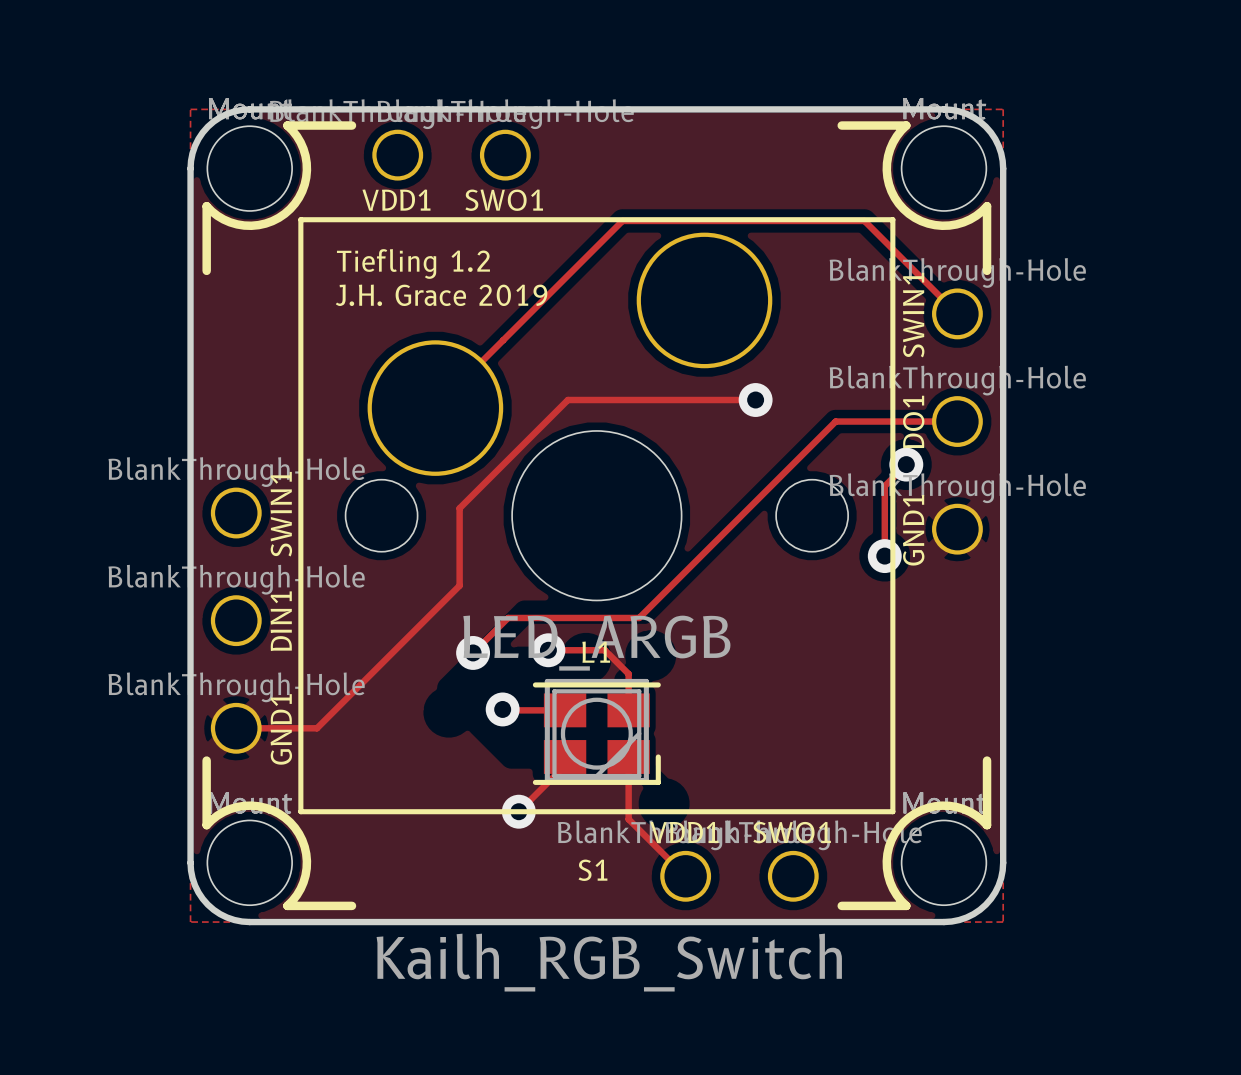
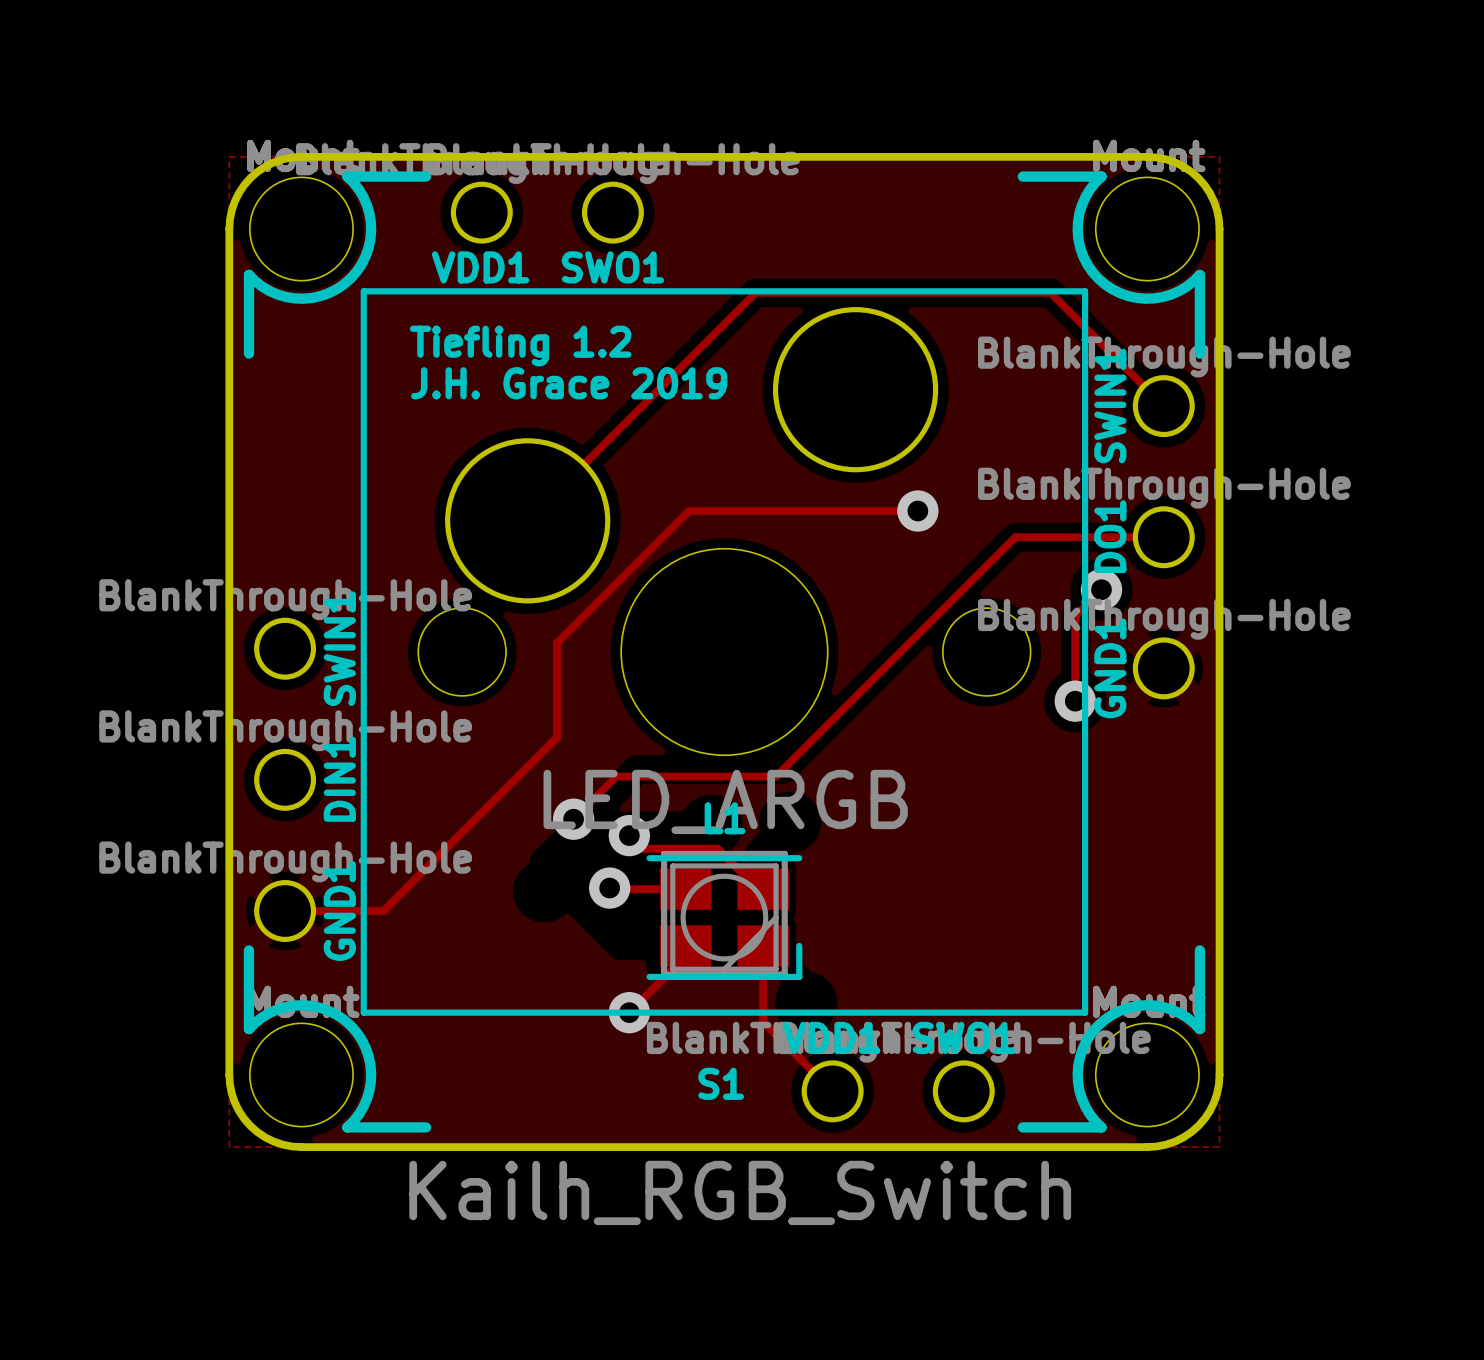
track: (548, 650) (604, 650) (628, 673) (628, 710) -> (629, 835) (642, 848) (717, 848) (757, 889) (763, 889)
via position: (548, 650) -> (629, 835)

